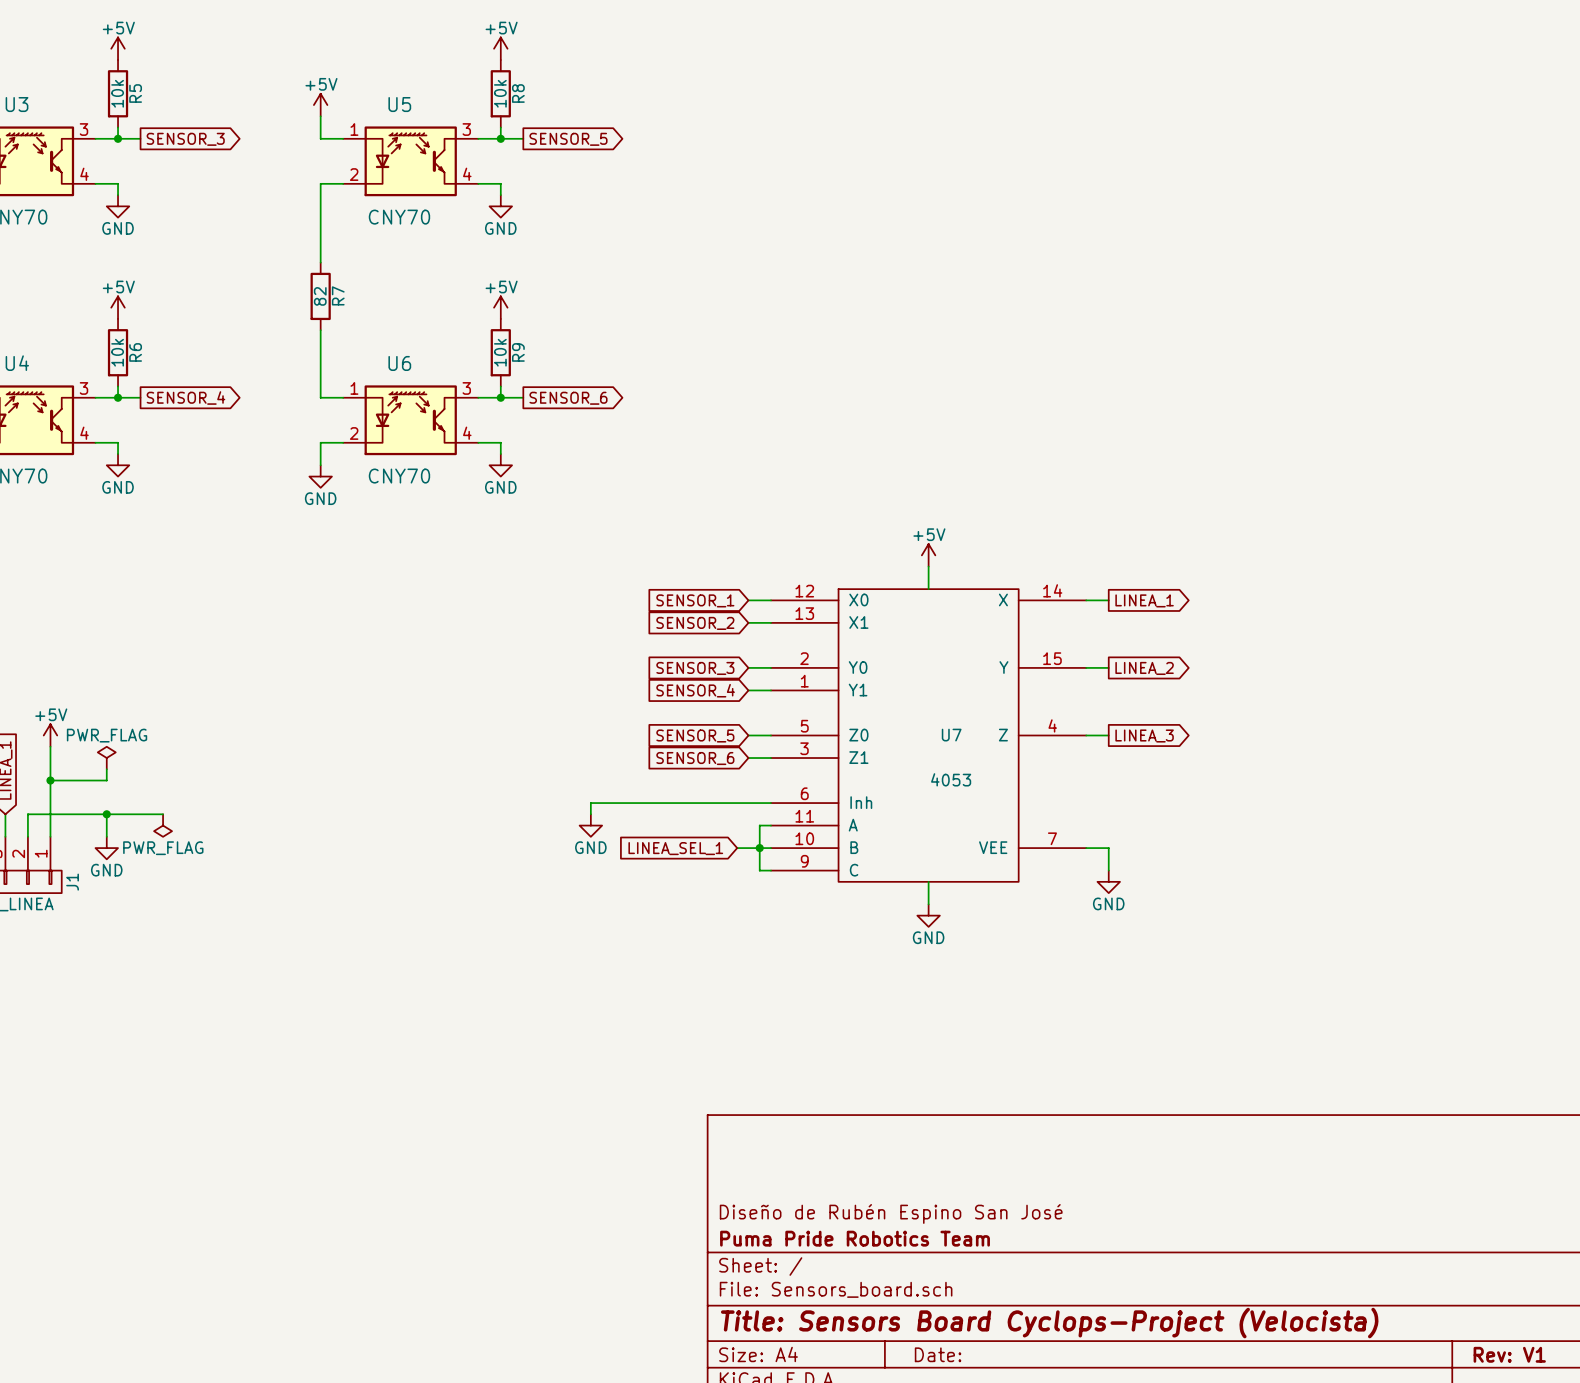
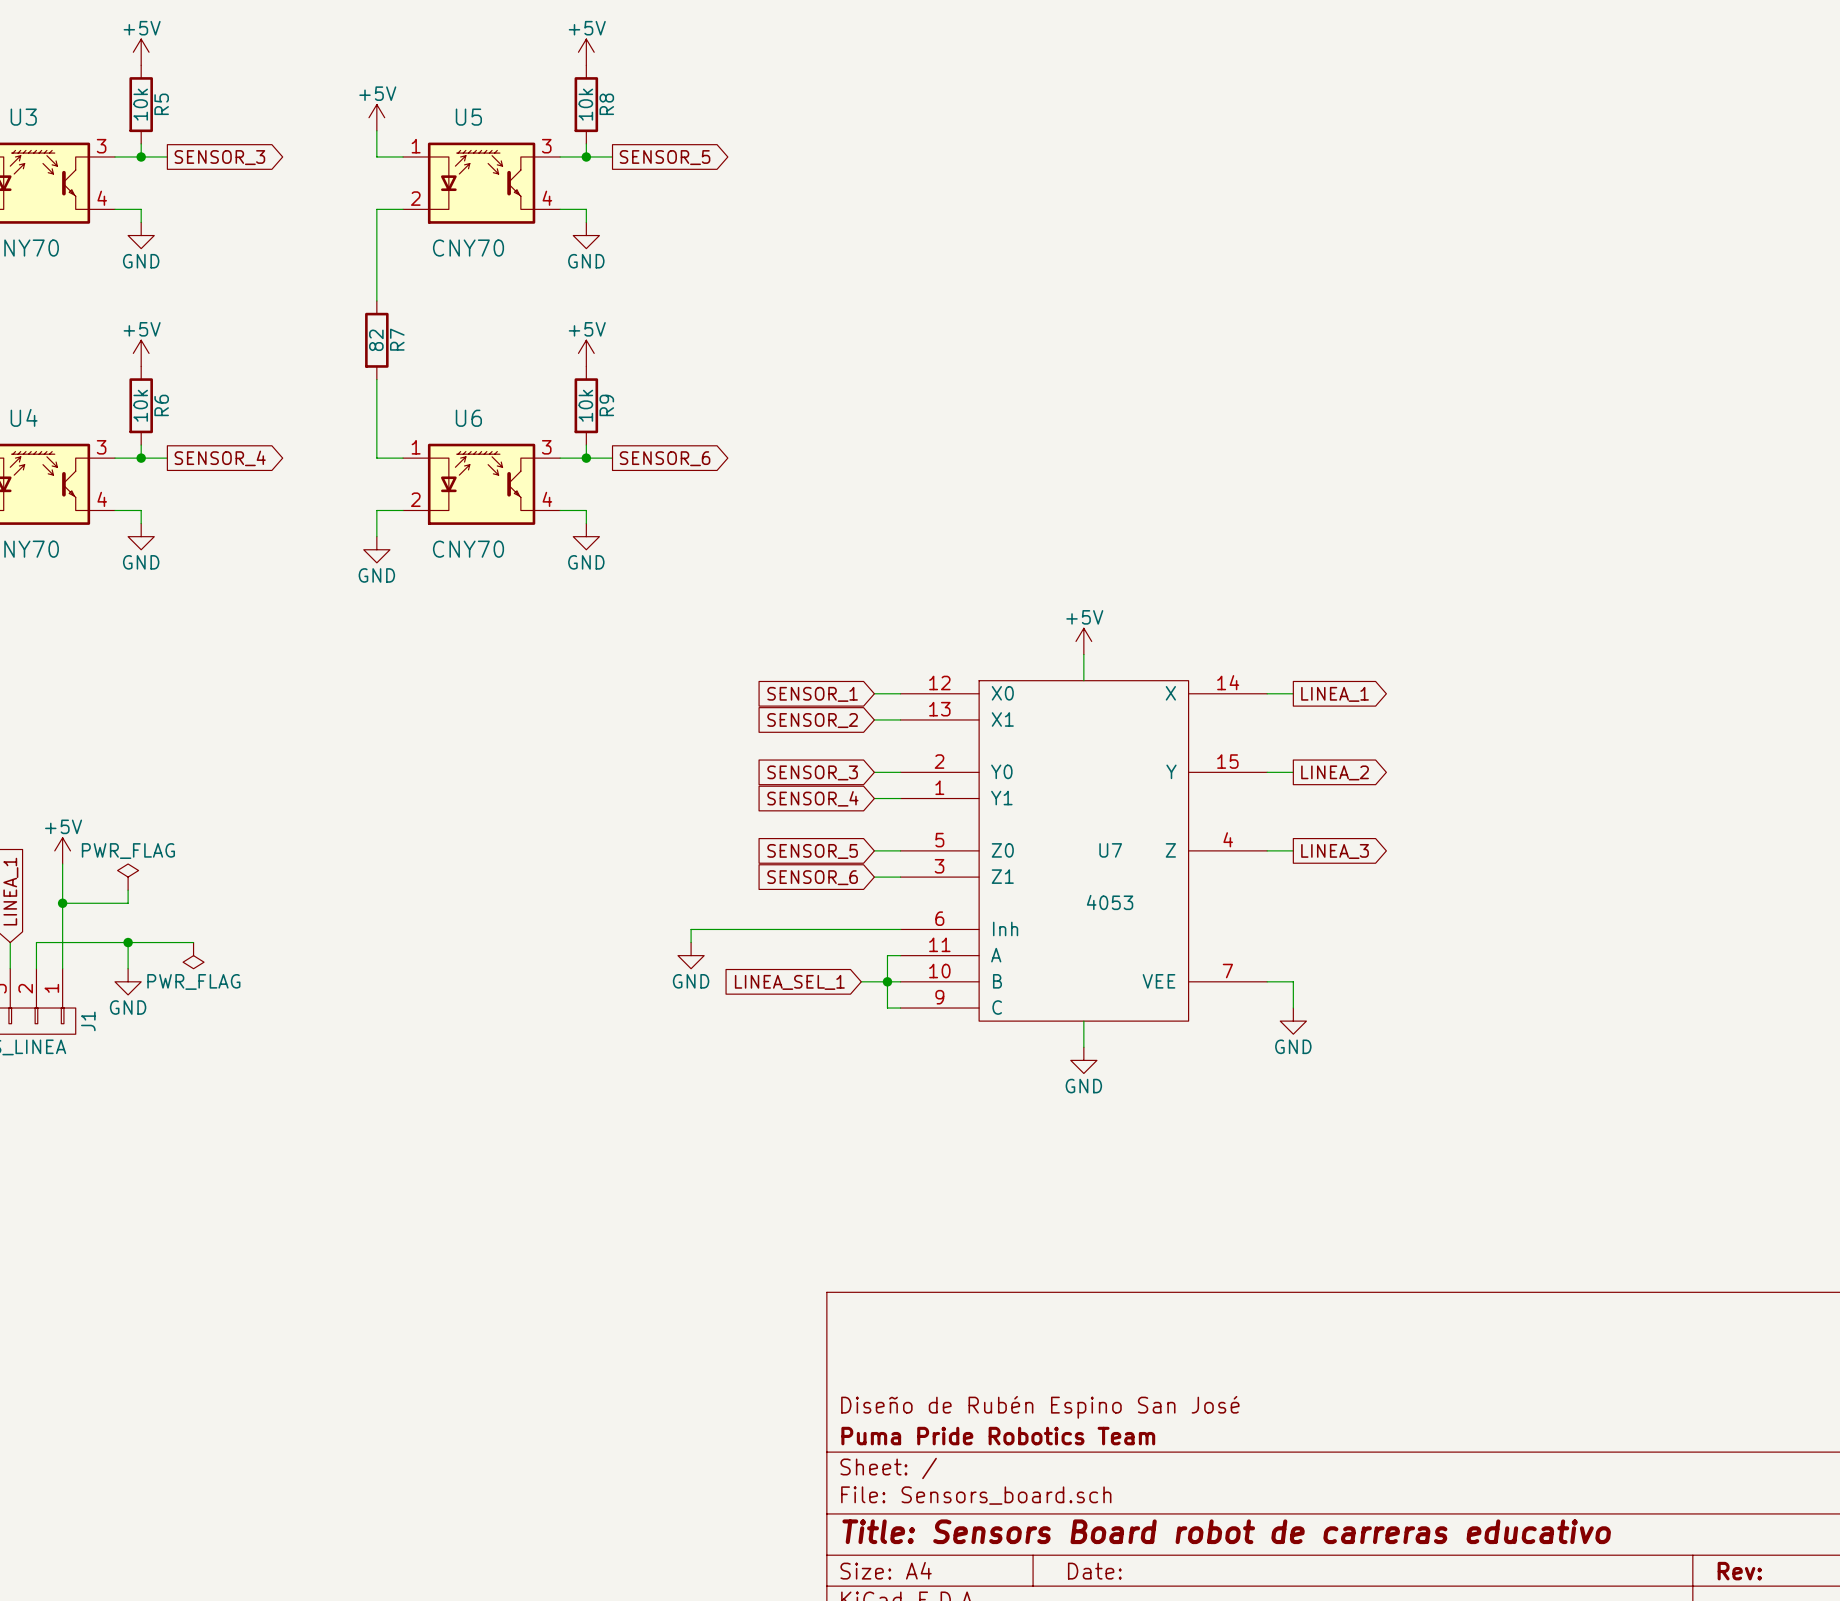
title block: Title: Sensors Board Cyclops-Project (Velocista) (1049, 1323) -> Title: Sensors Board robot de carreras educativo (1226, 1531)
title block: Rev: V1 (1509, 1354) -> Rev: (1739, 1571)

